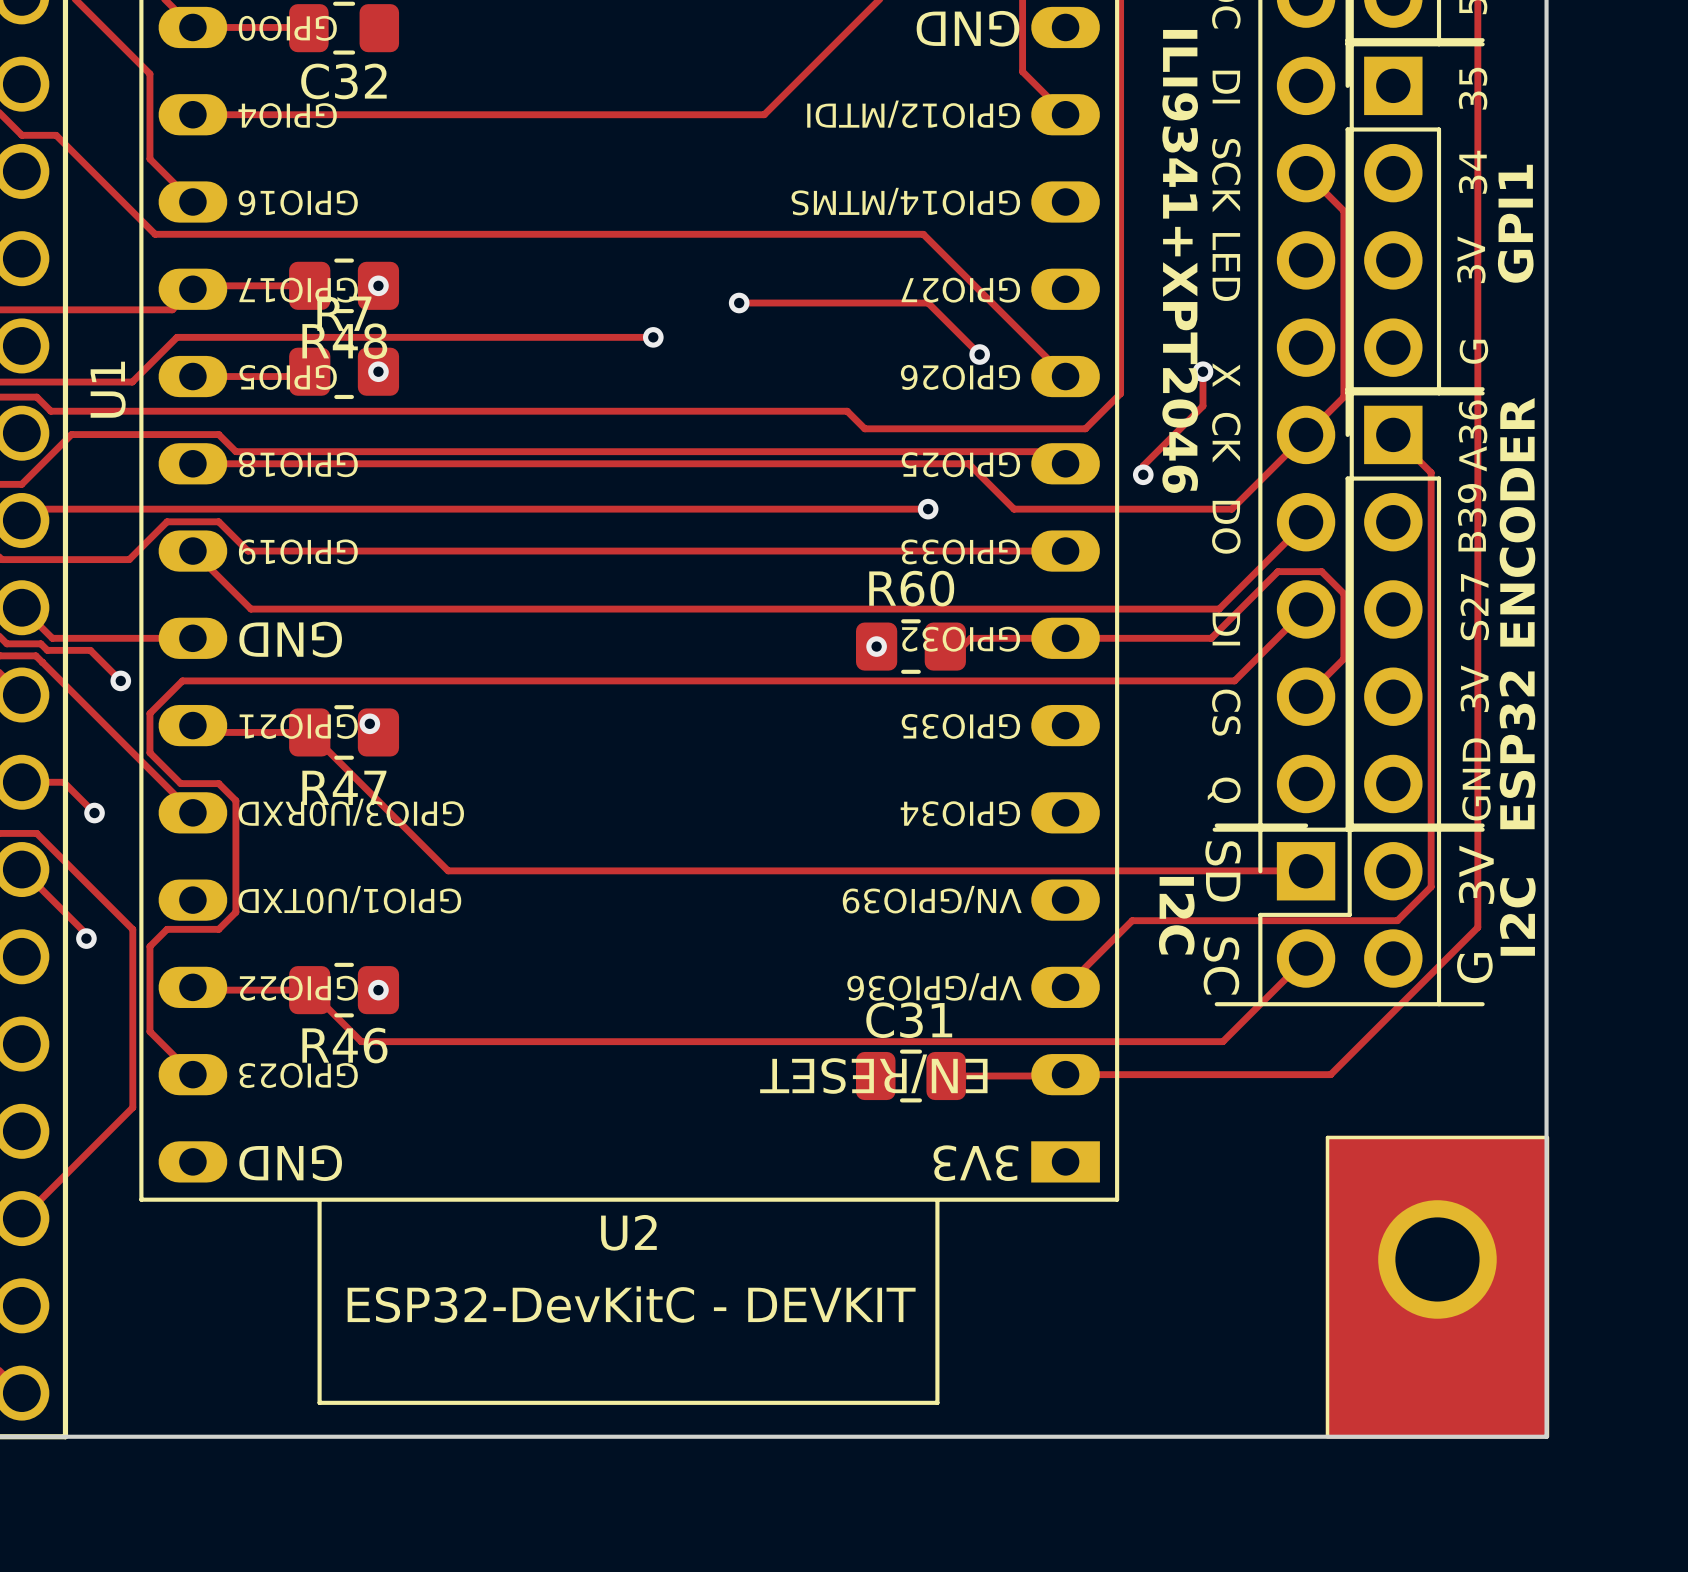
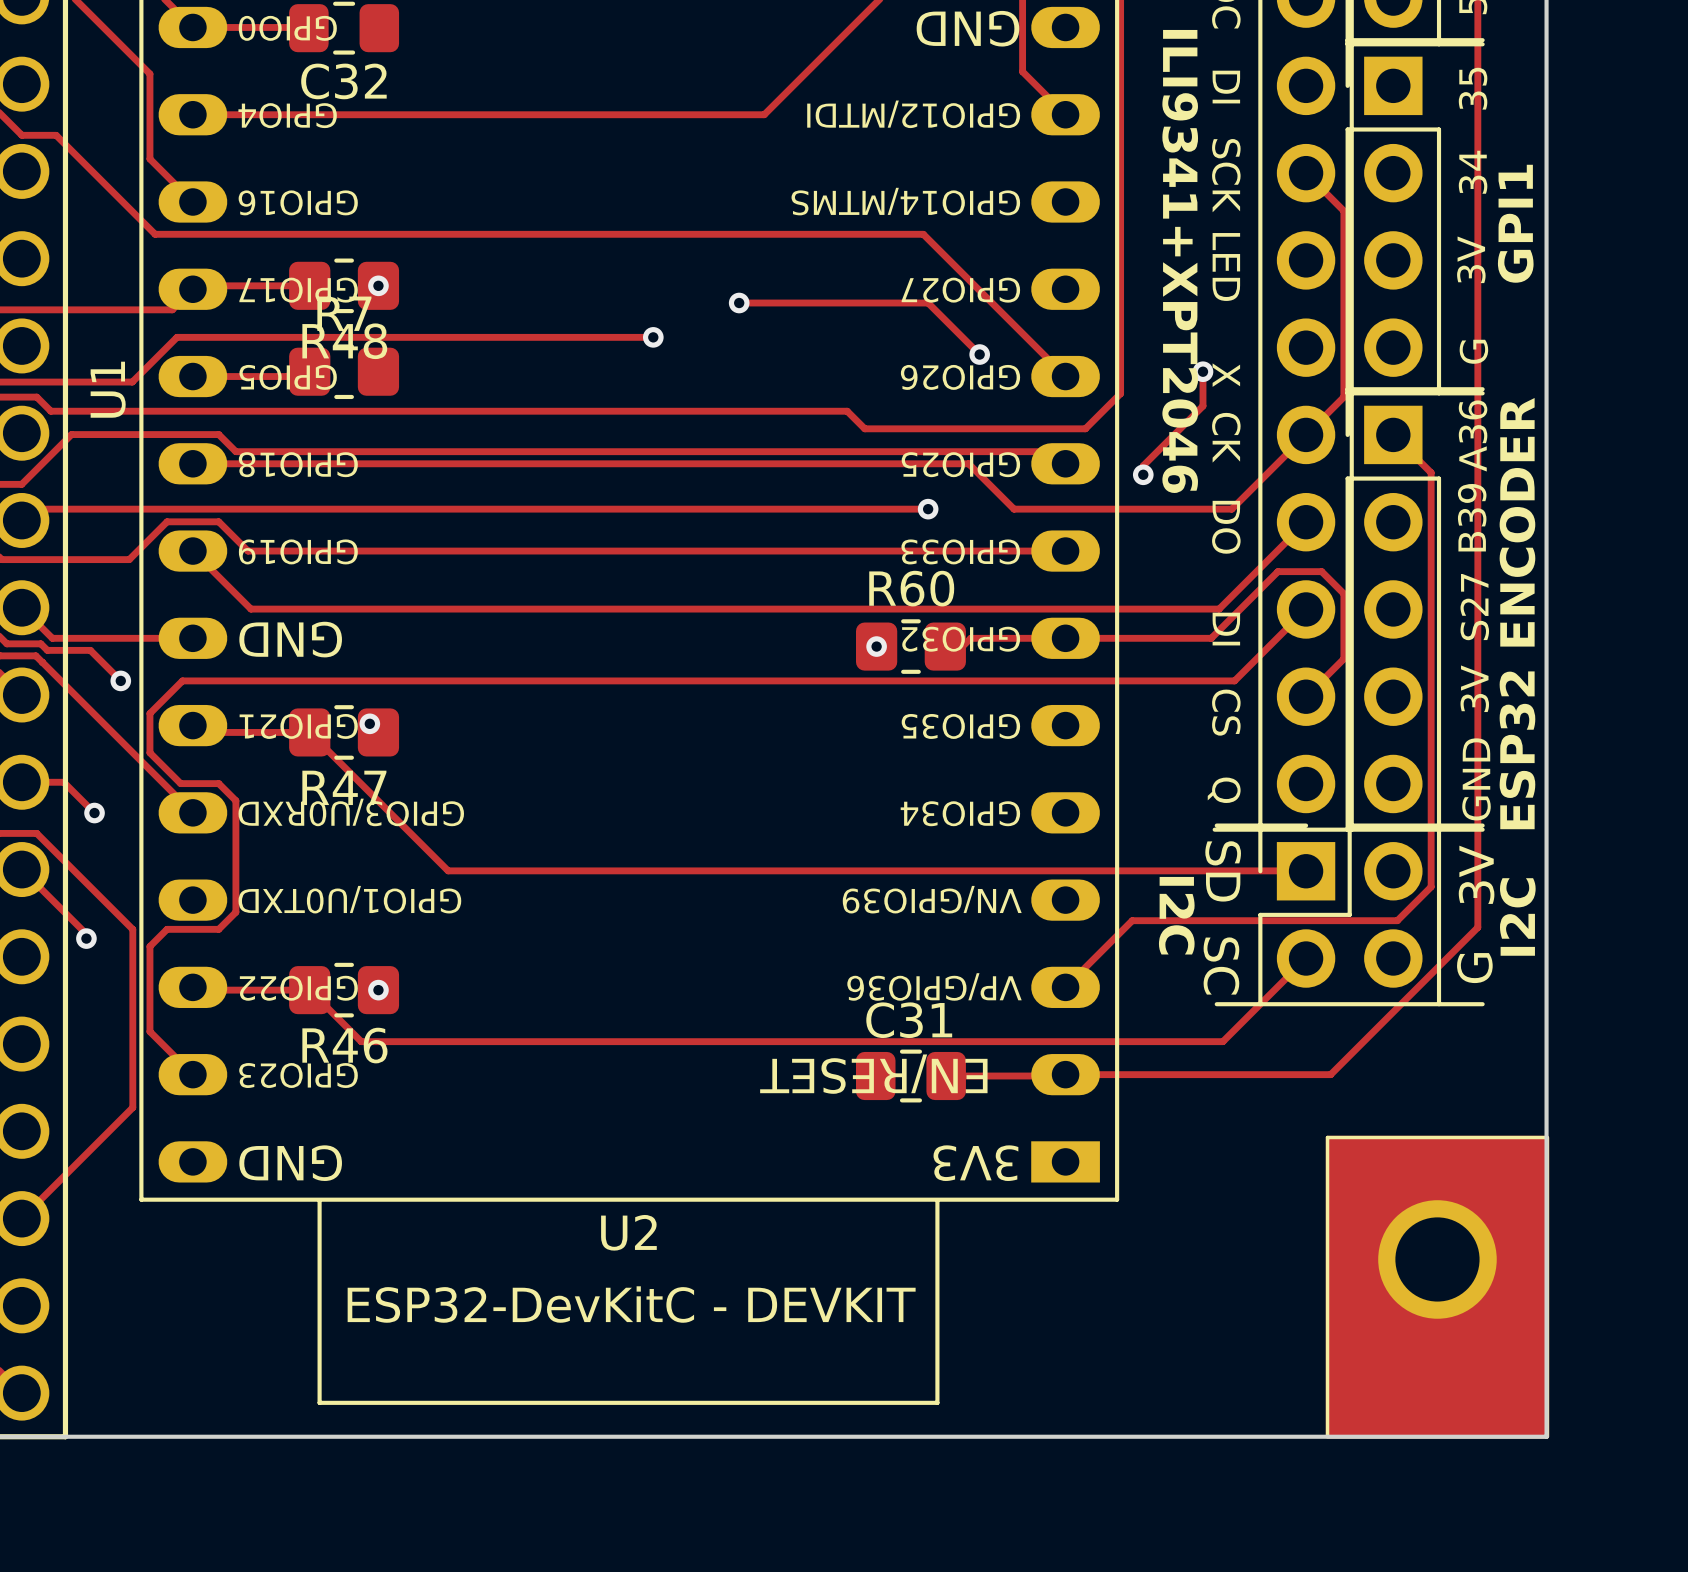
via: (378, 371) -> none

